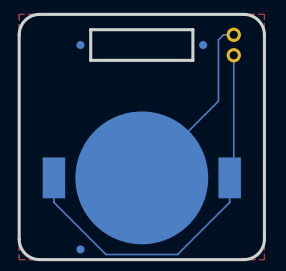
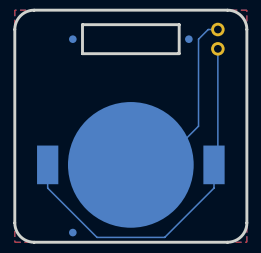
bottom track: (218, 39) (218, 101) (141, 177) -> (203, 34) (198, 39) (198, 126) (159, 164) (130, 164)

